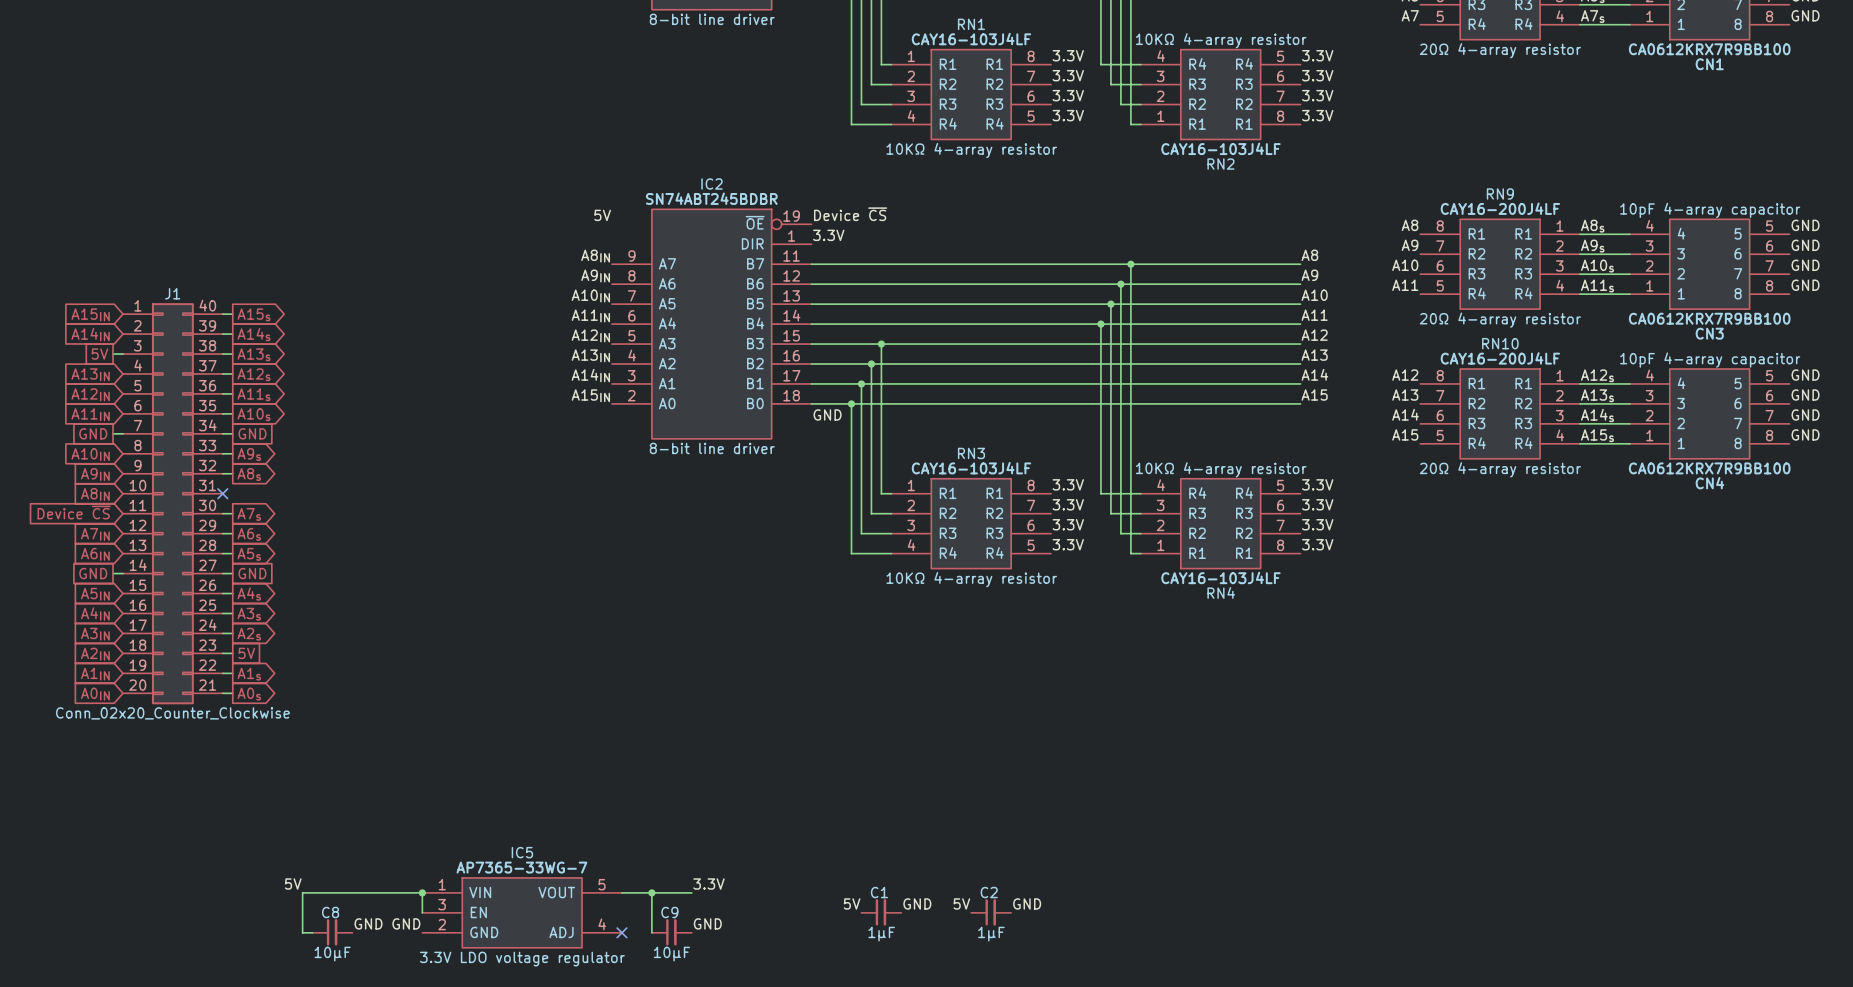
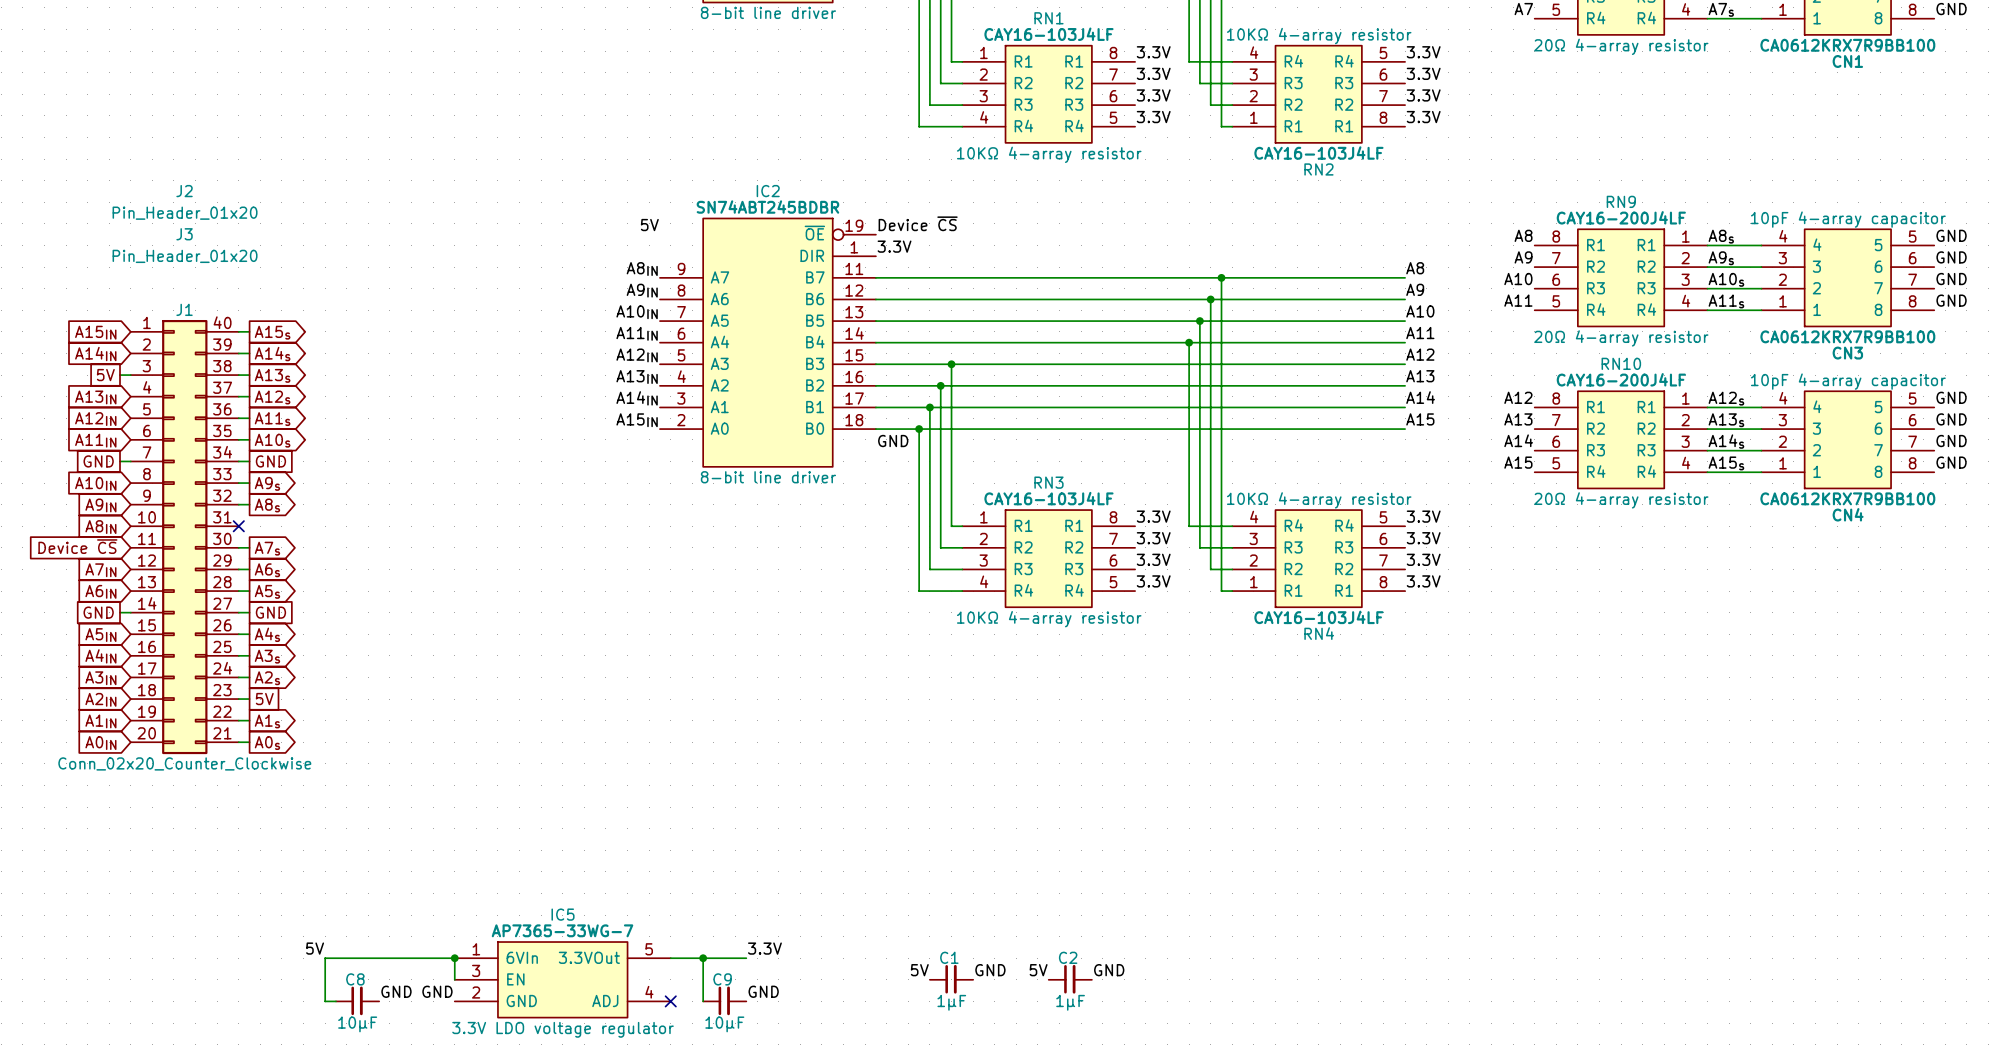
J2: none -> Pin_Header_01x20 (185, 202)
J3: none -> Pin_Header_01x20 (185, 245)
IC5 pin name: VIN (480, 892) -> 6VIn (522, 957)
IC5 pin name: VOUT (556, 892) -> 3.3VOut (589, 957)

